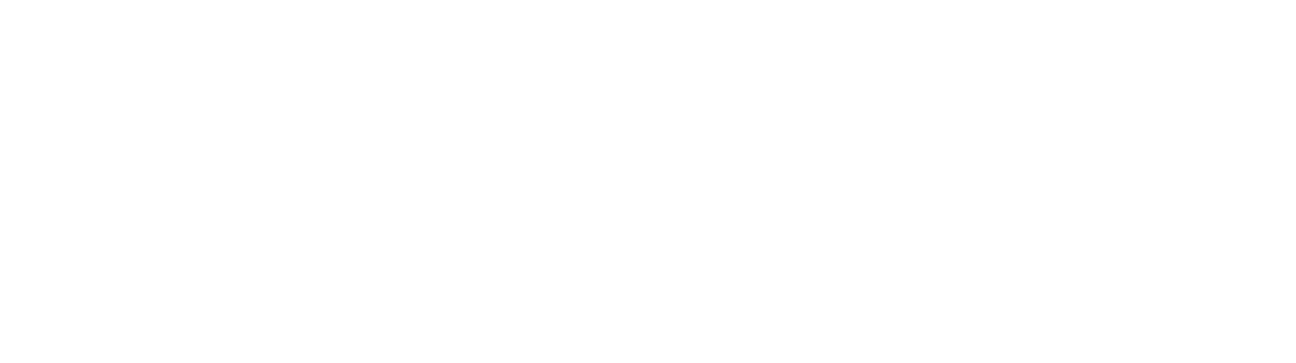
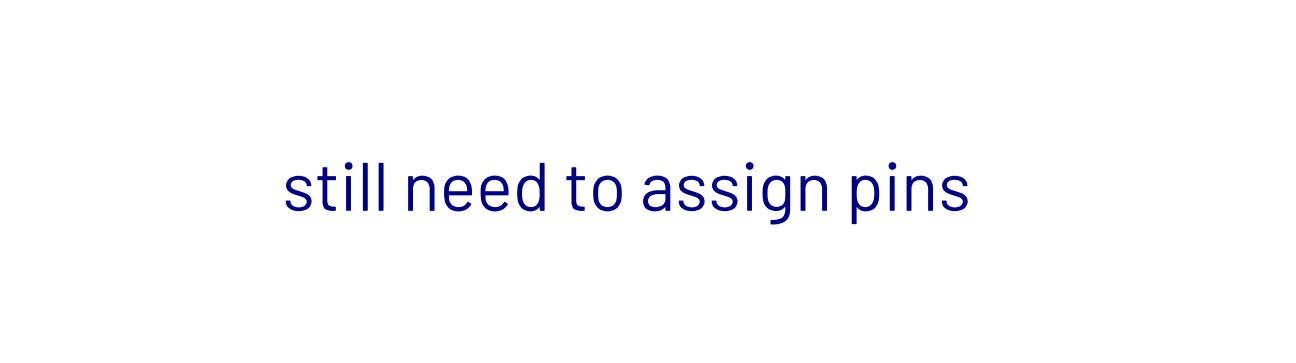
text: none -> still need to assign pins (626, 193)

